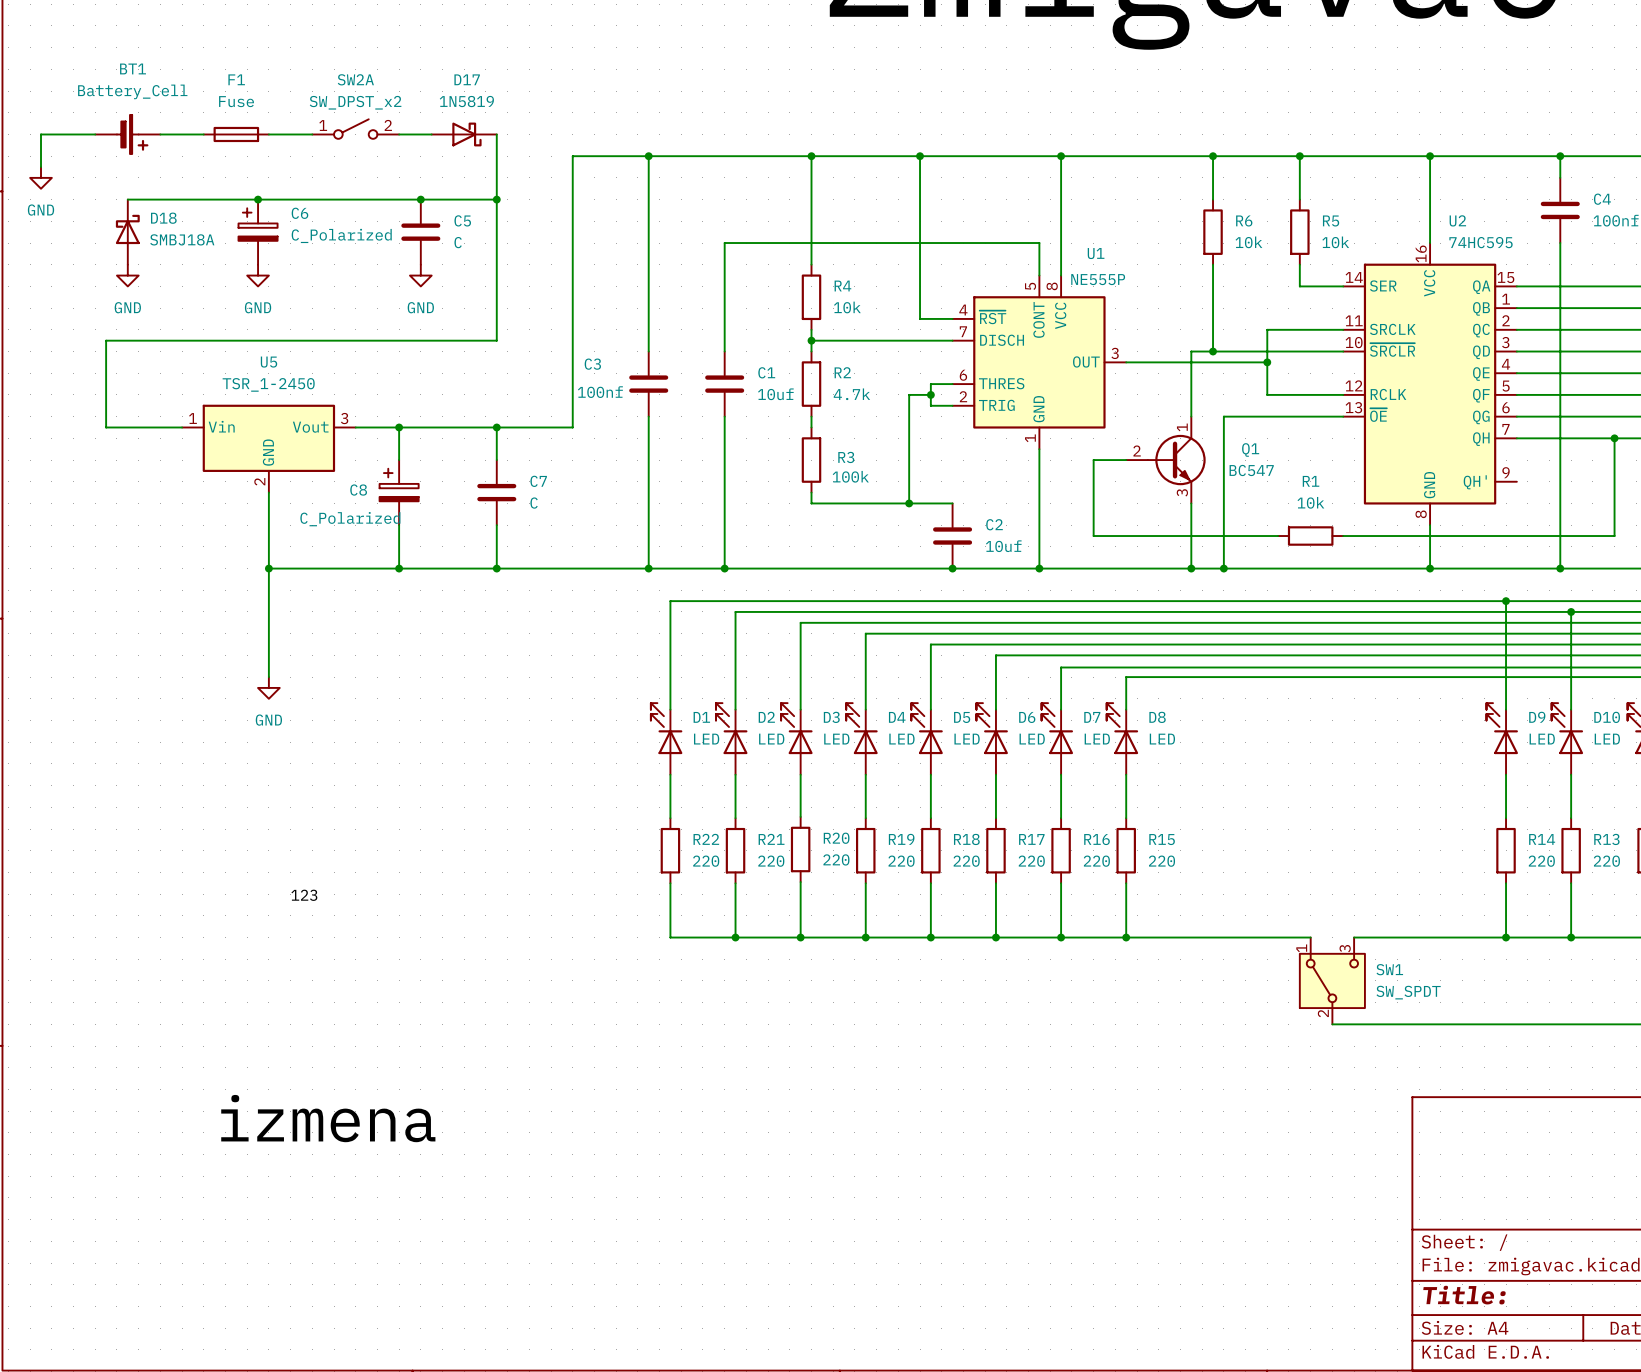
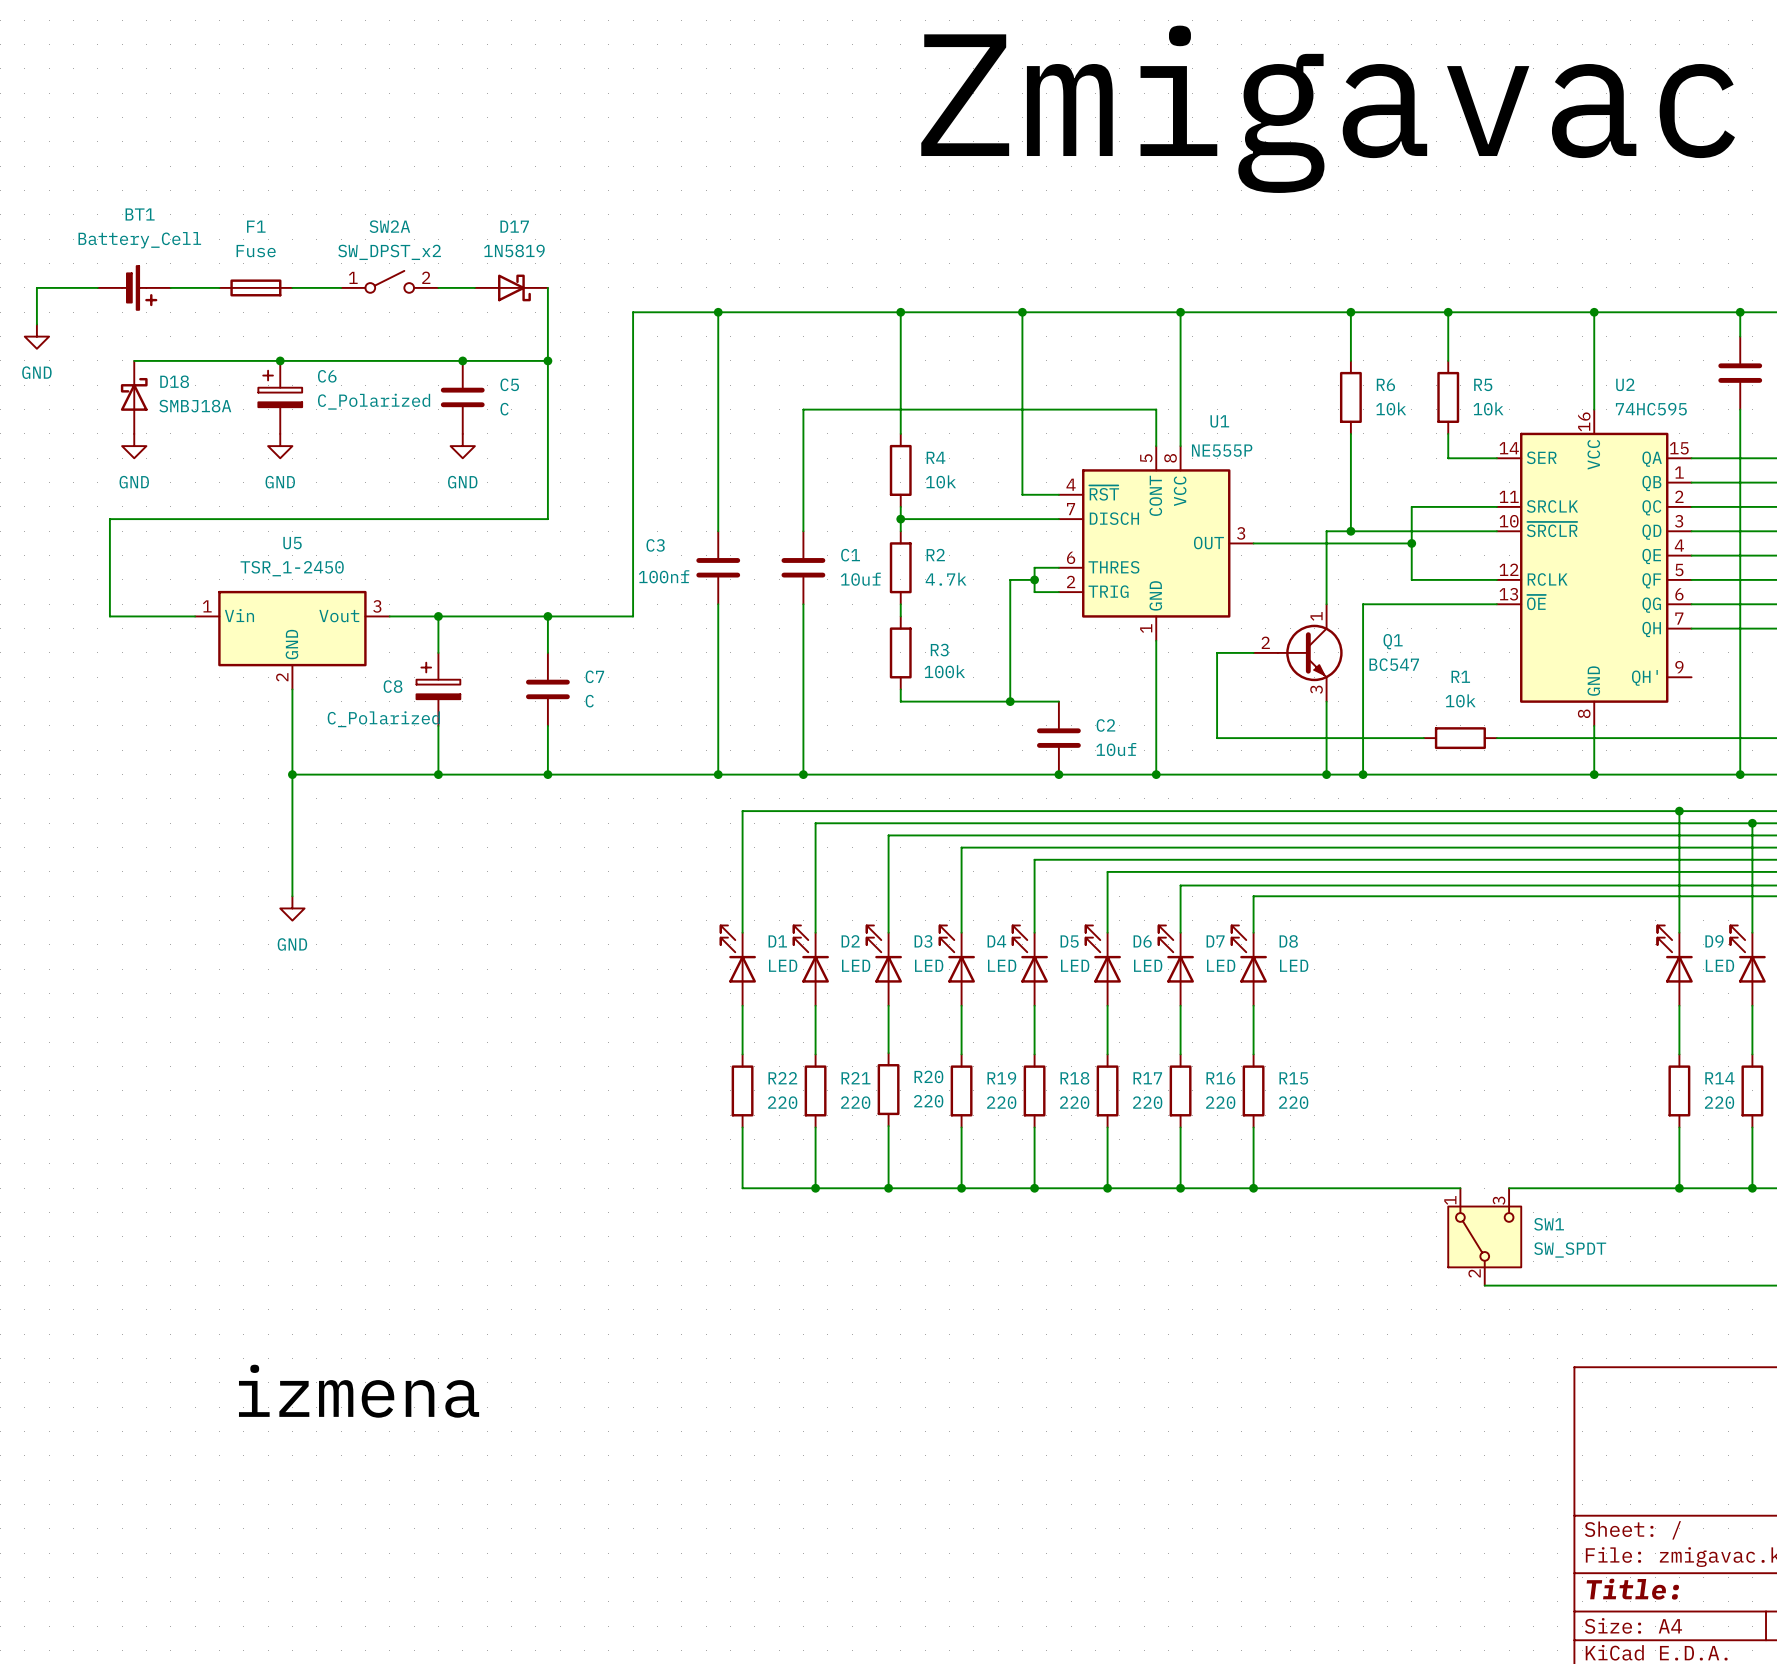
label: 123 (304, 895) -> none

